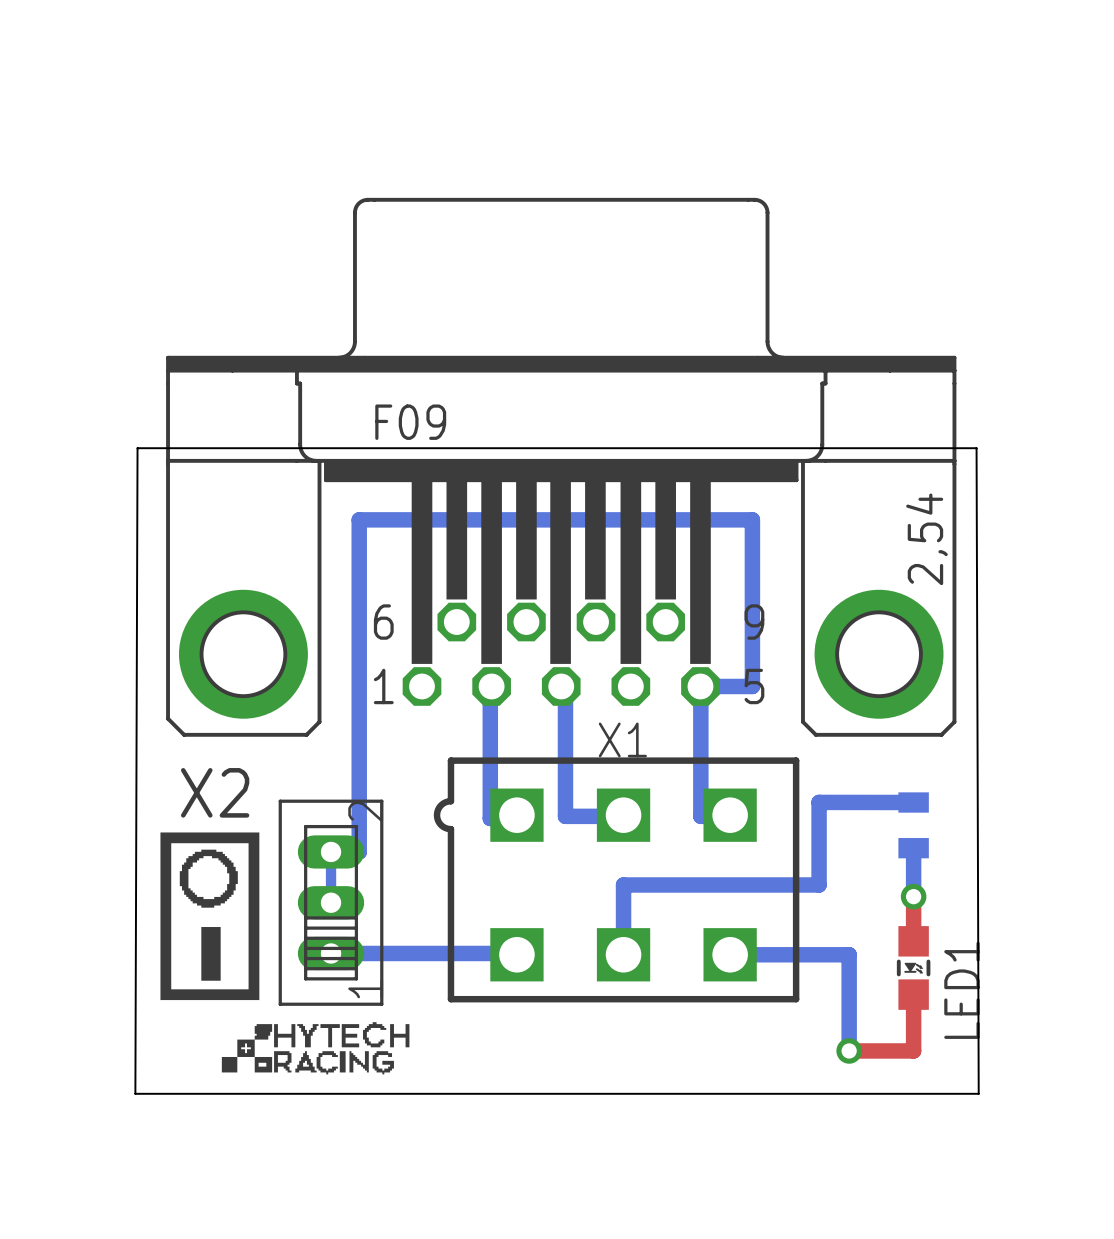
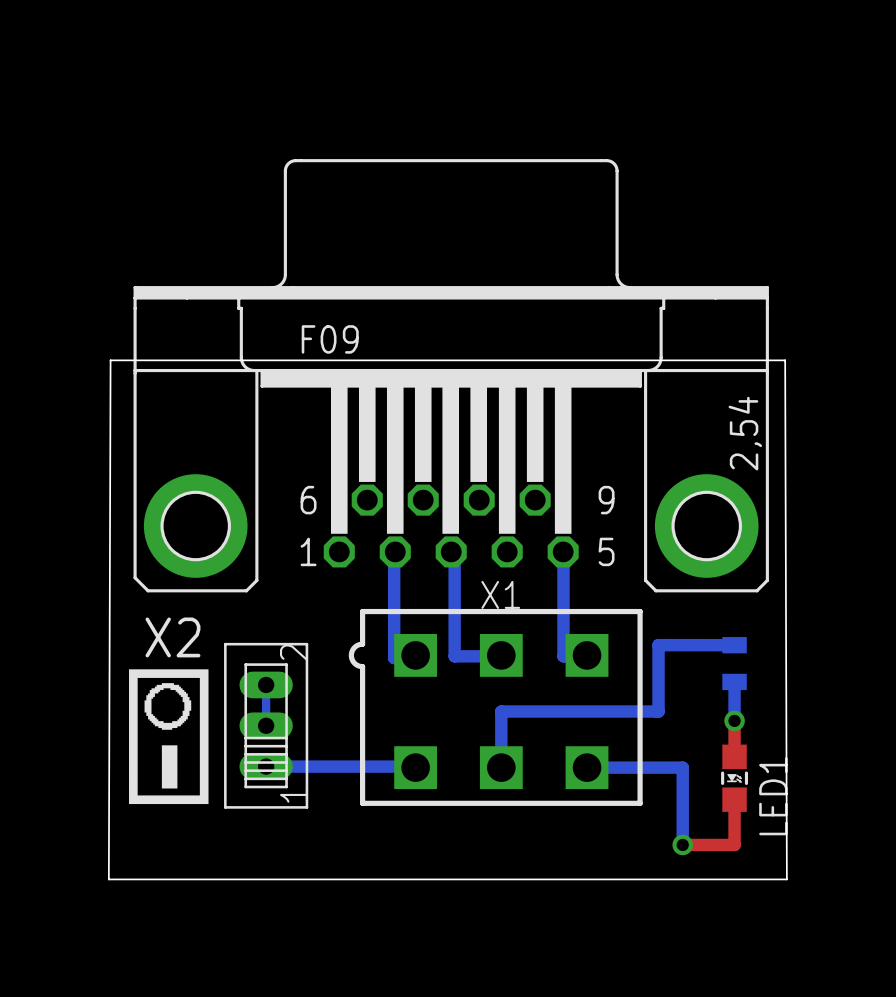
bottom track: (700, 686) (752, 686) (752, 519) (359, 519) (359, 851) (331, 851) -> none
drawing: [221, 1022, 410, 1075] -> none

